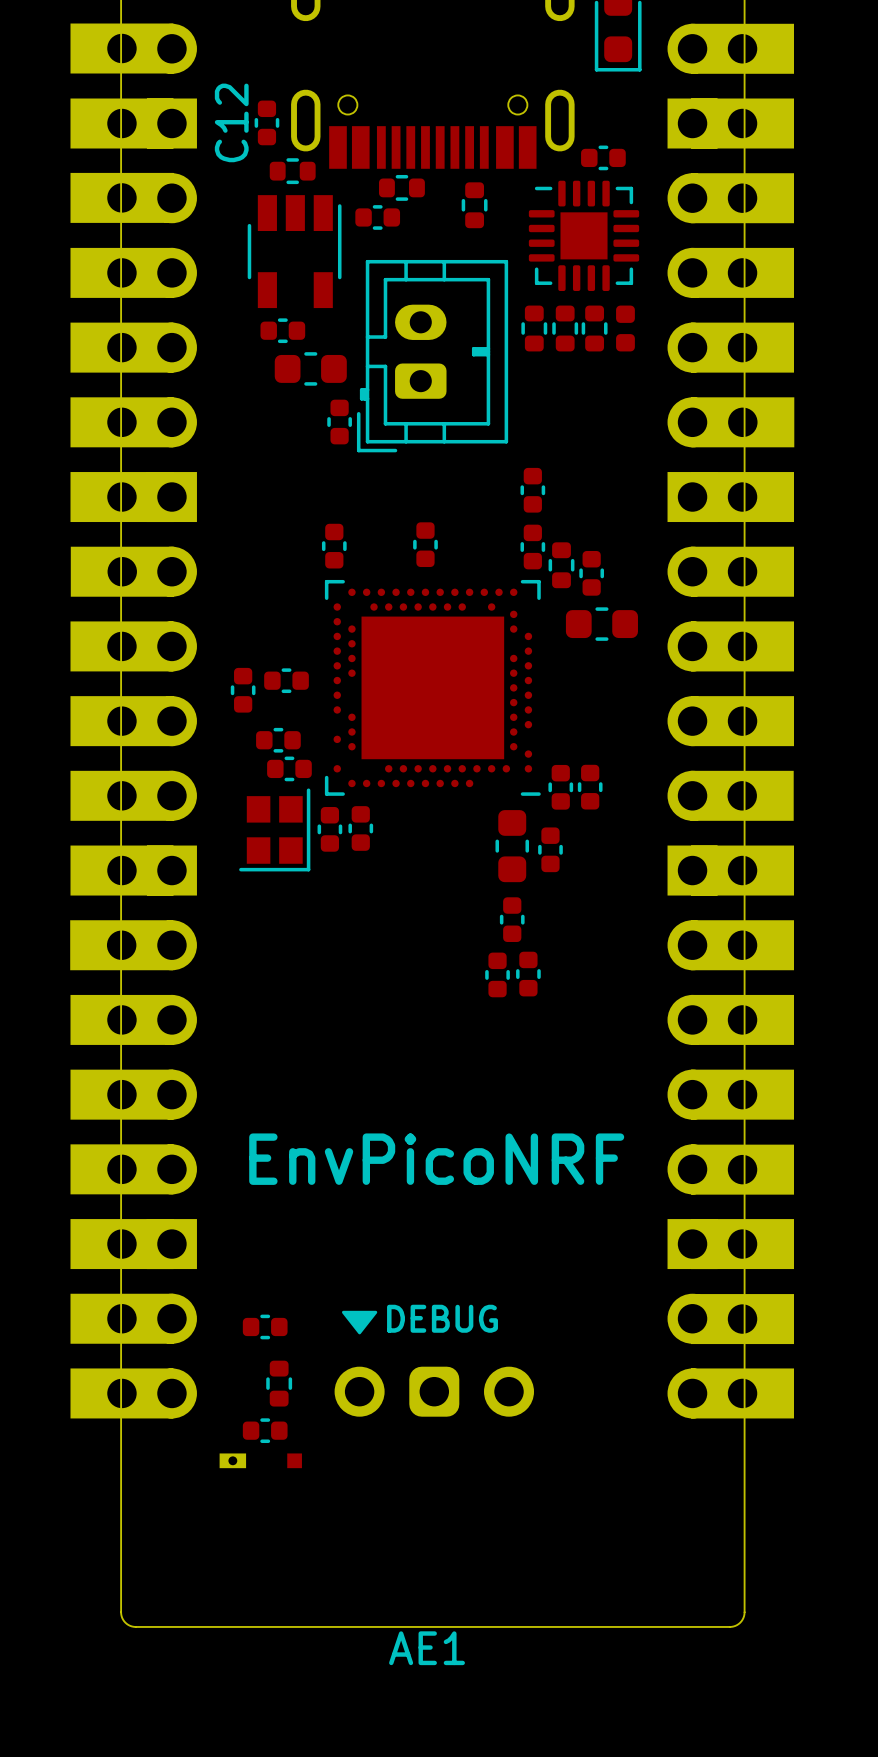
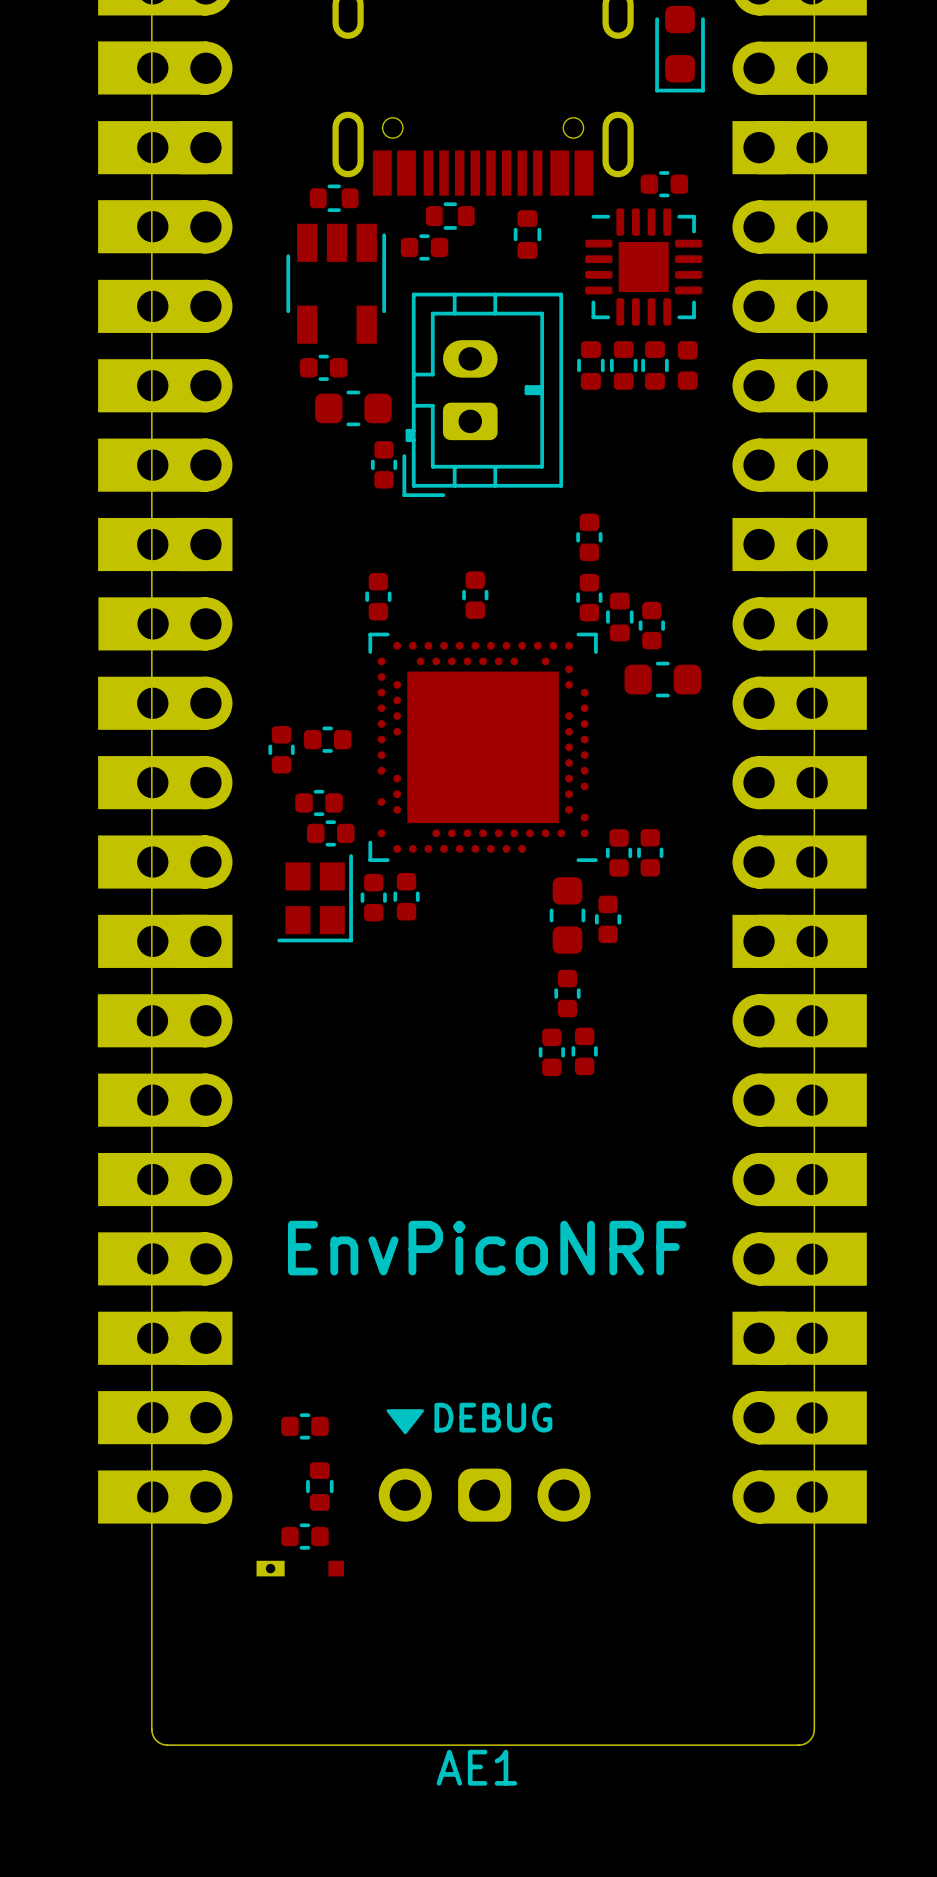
C12: (266, 122) -> none

